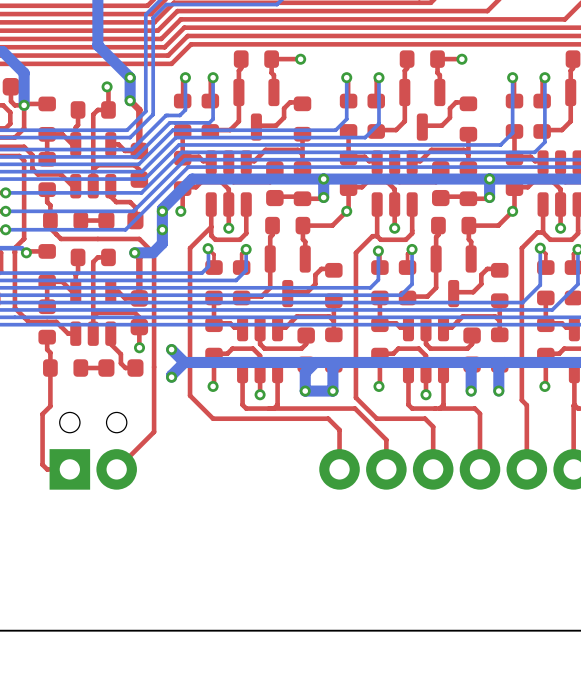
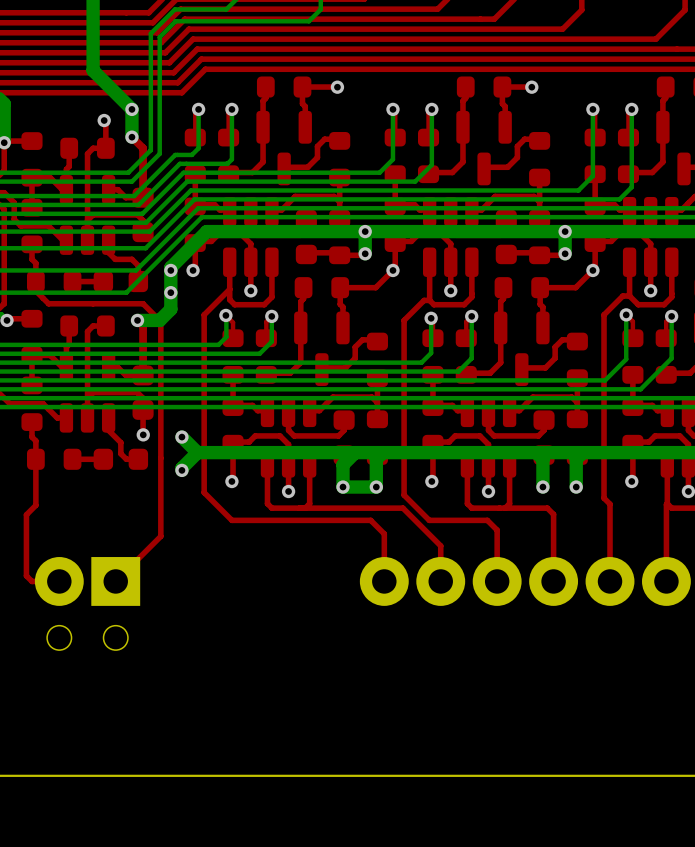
part rotation: 0° (93, 451) -> 180° (87, 603)

